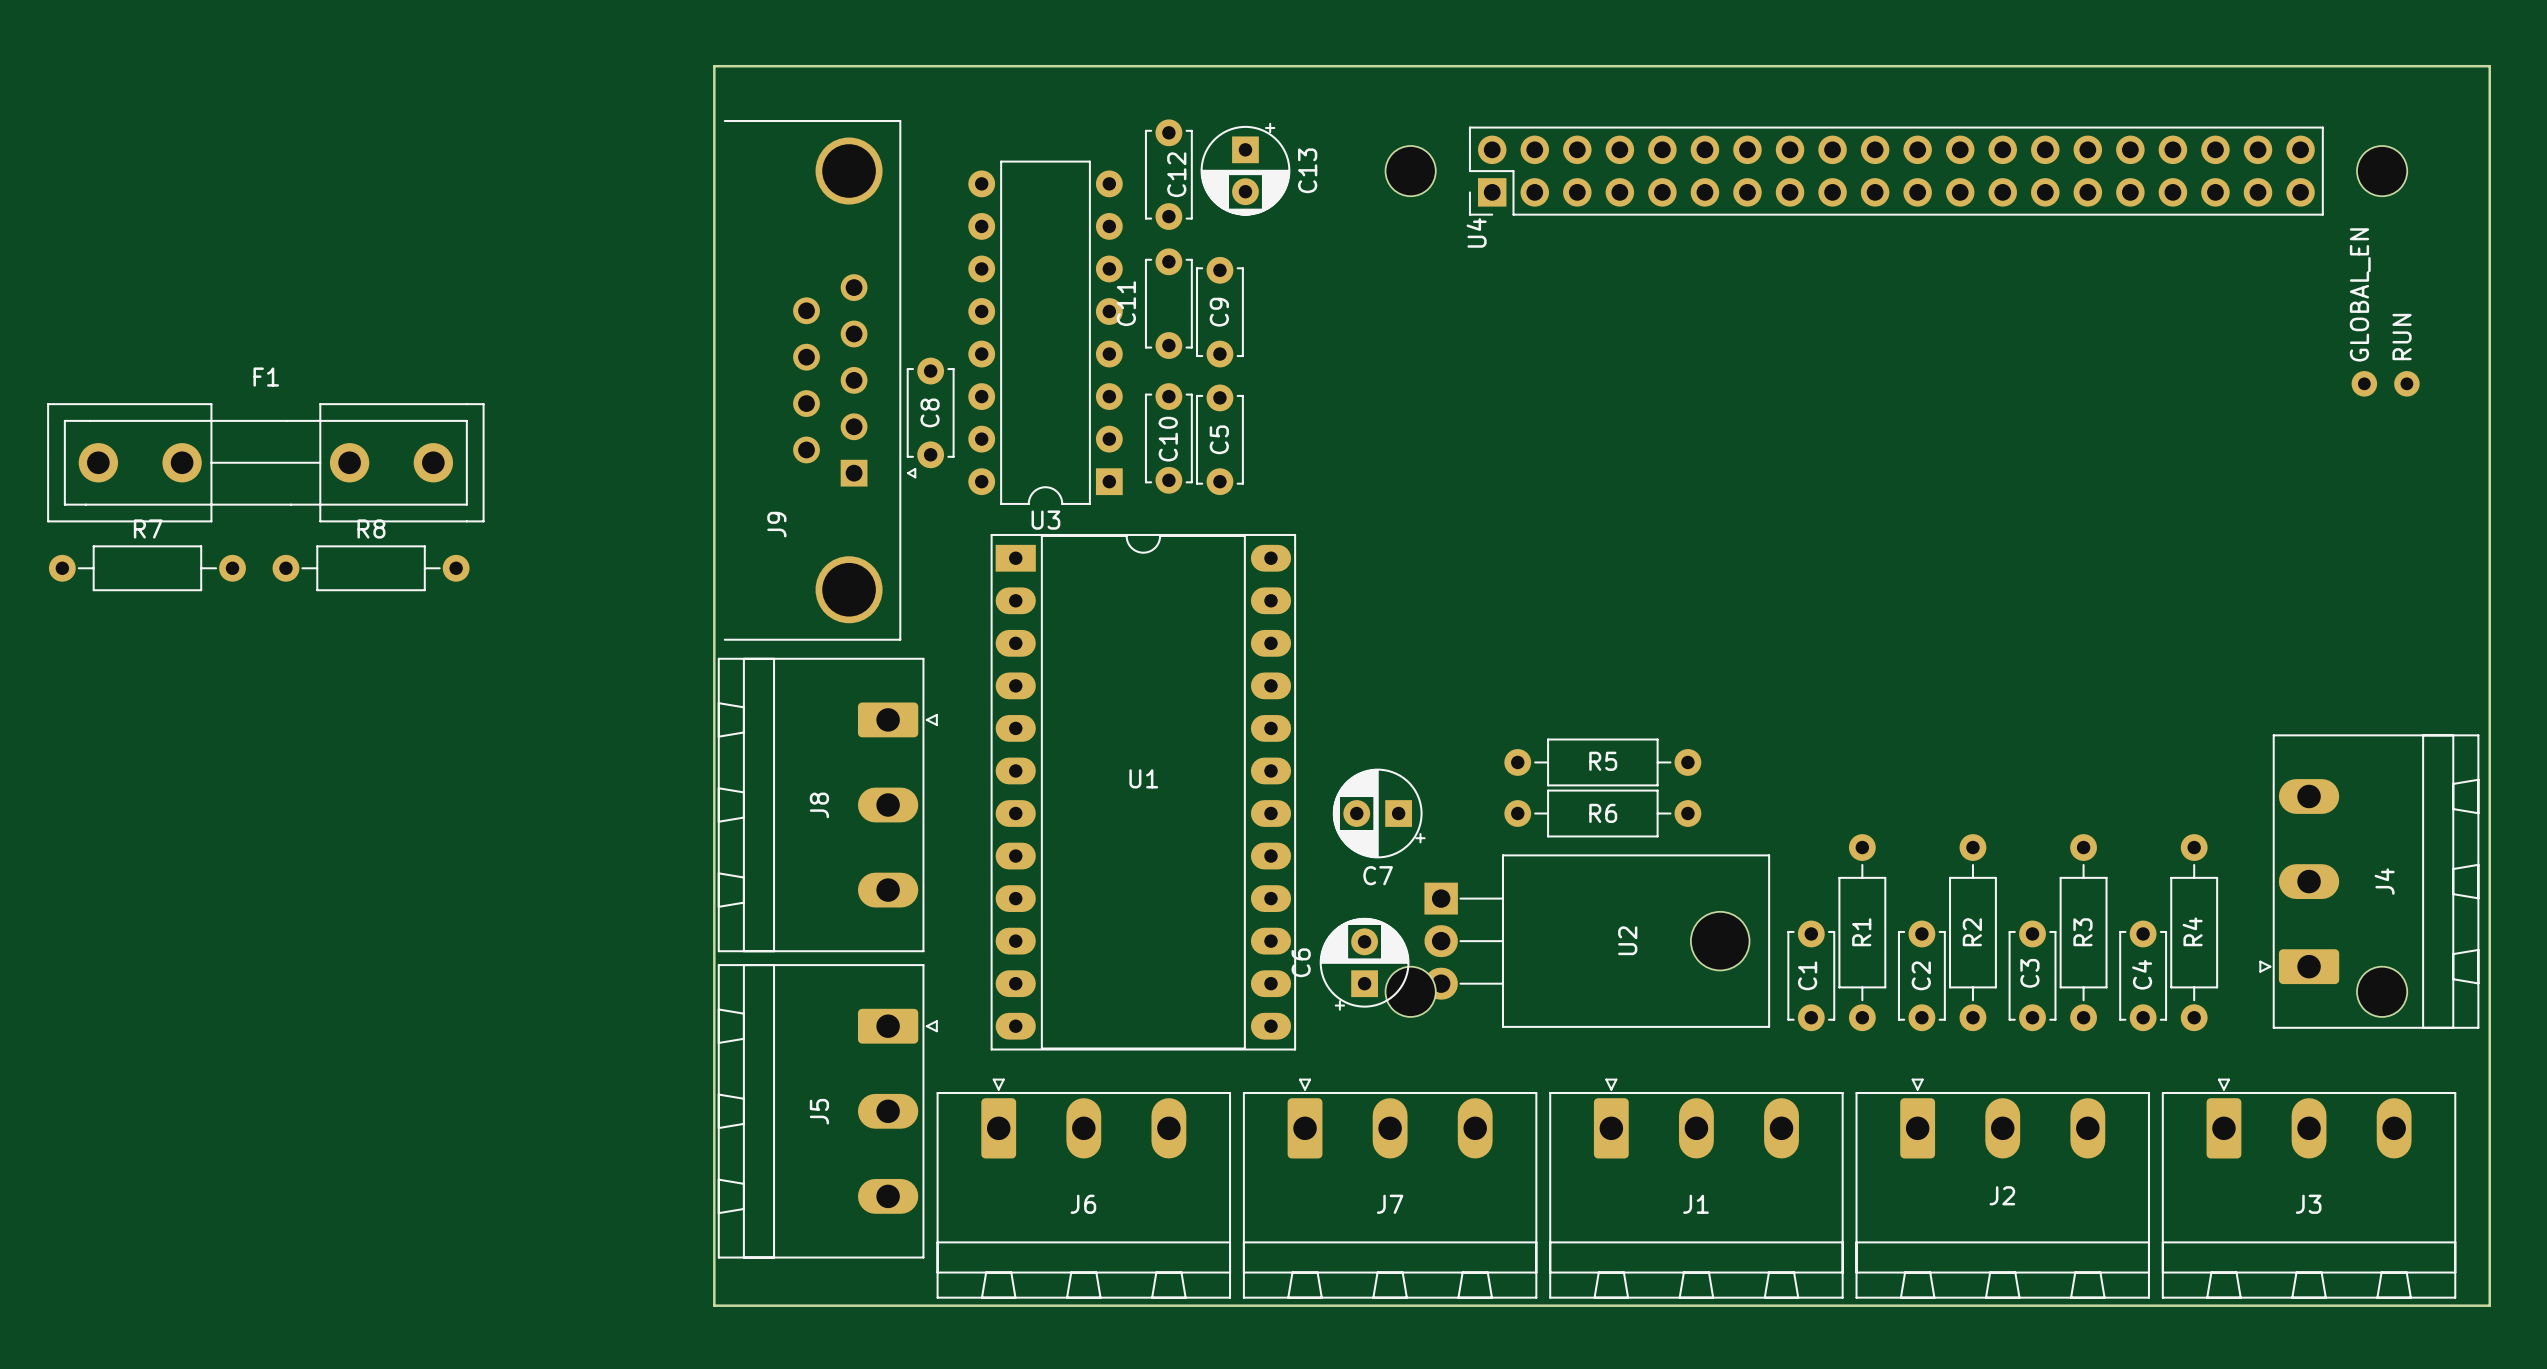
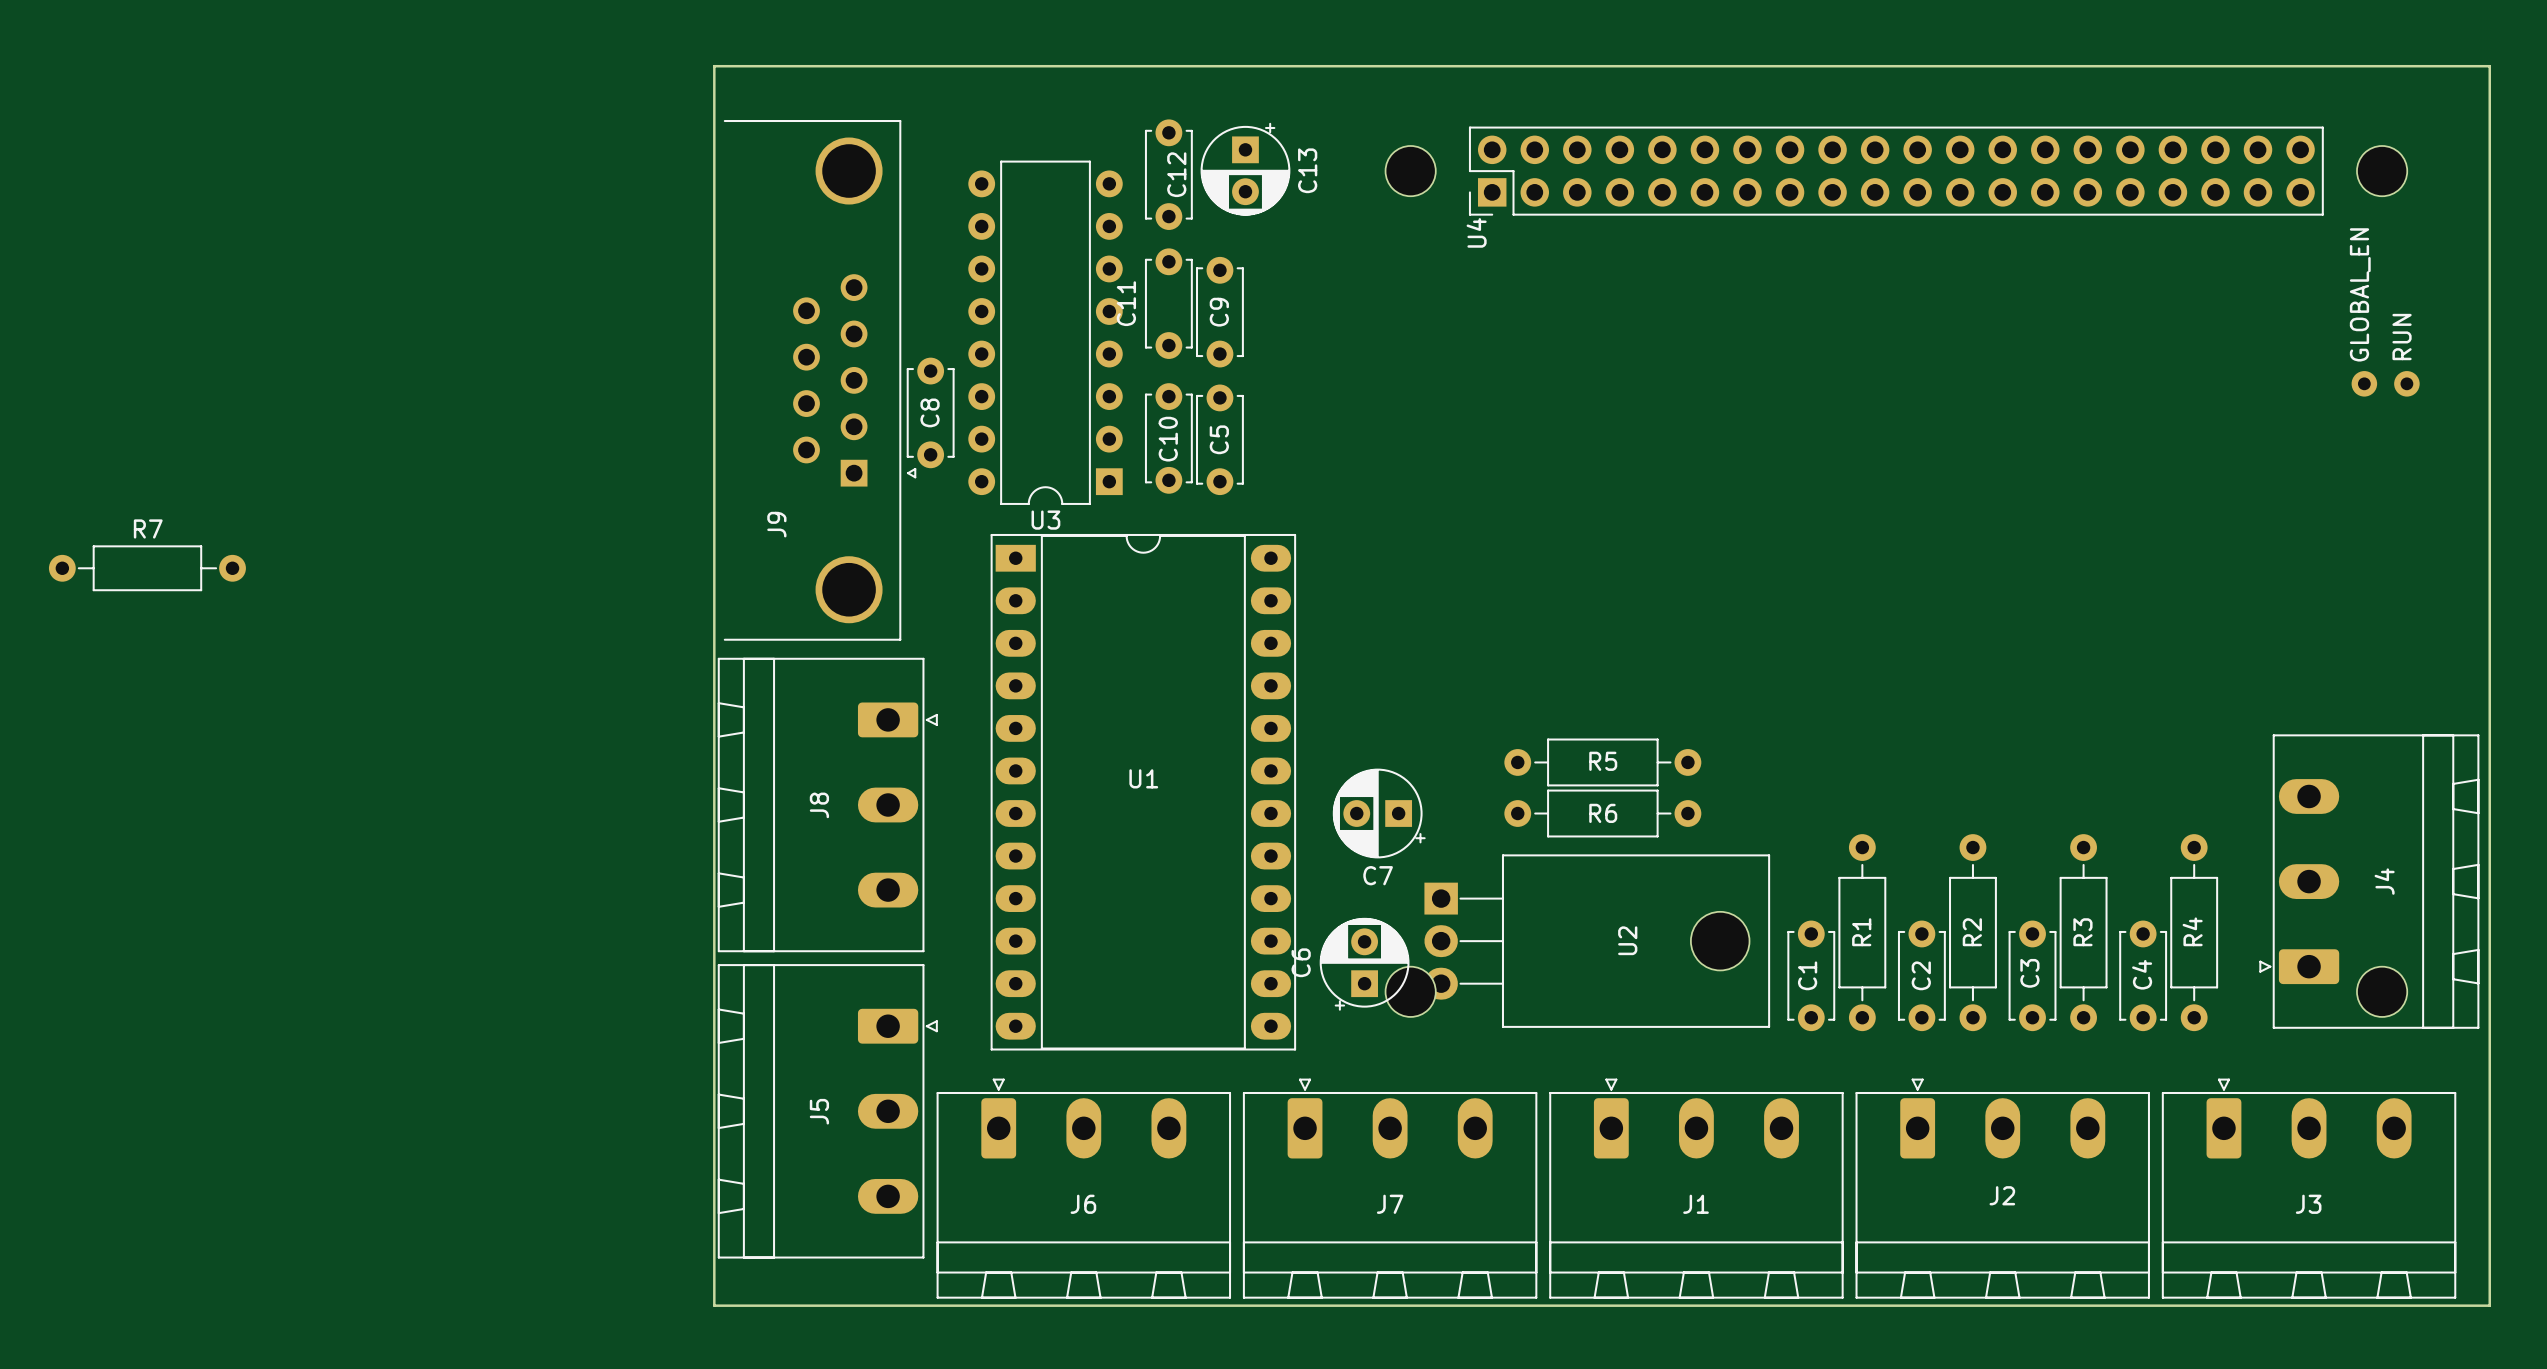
F1: (265, 462) -> none
R8: (371, 568) -> none

